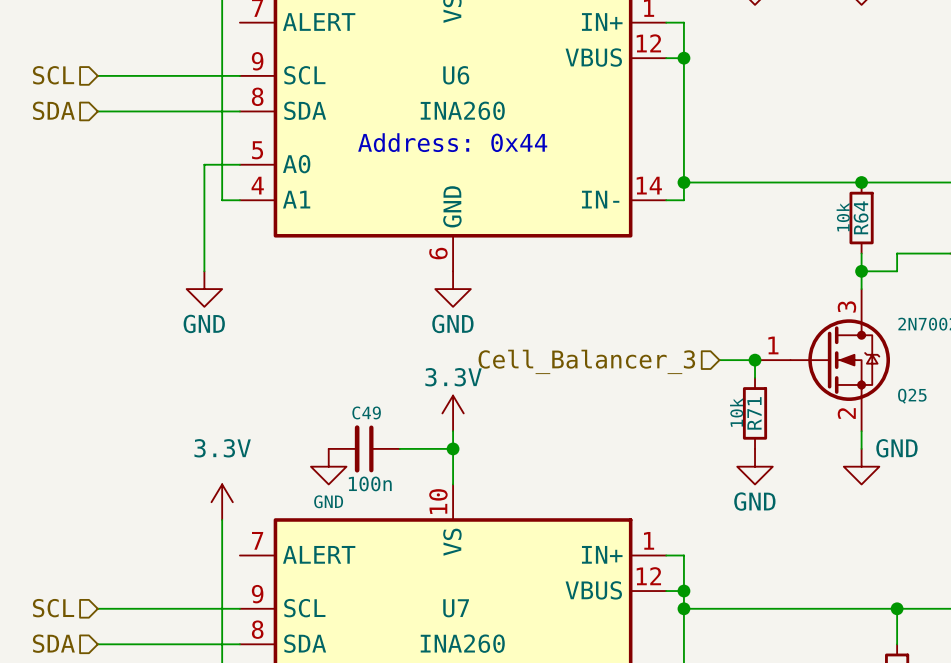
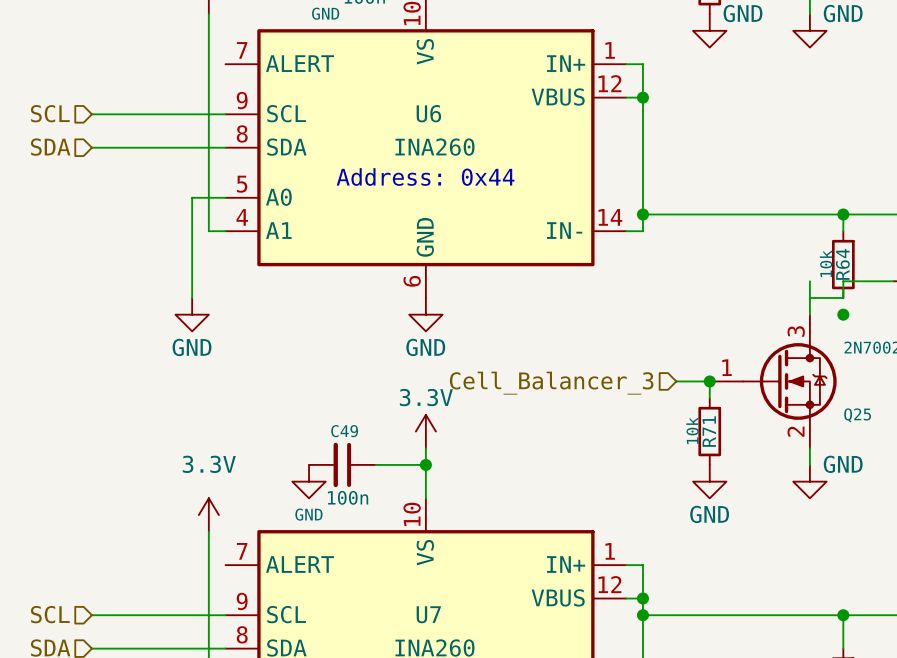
junction position: (861, 182) -> (843, 214)
wire: none -> (843, 214) (843, 231)
R64 position: (861, 218) -> (843, 264)
junction position: (861, 271) -> (843, 314)

